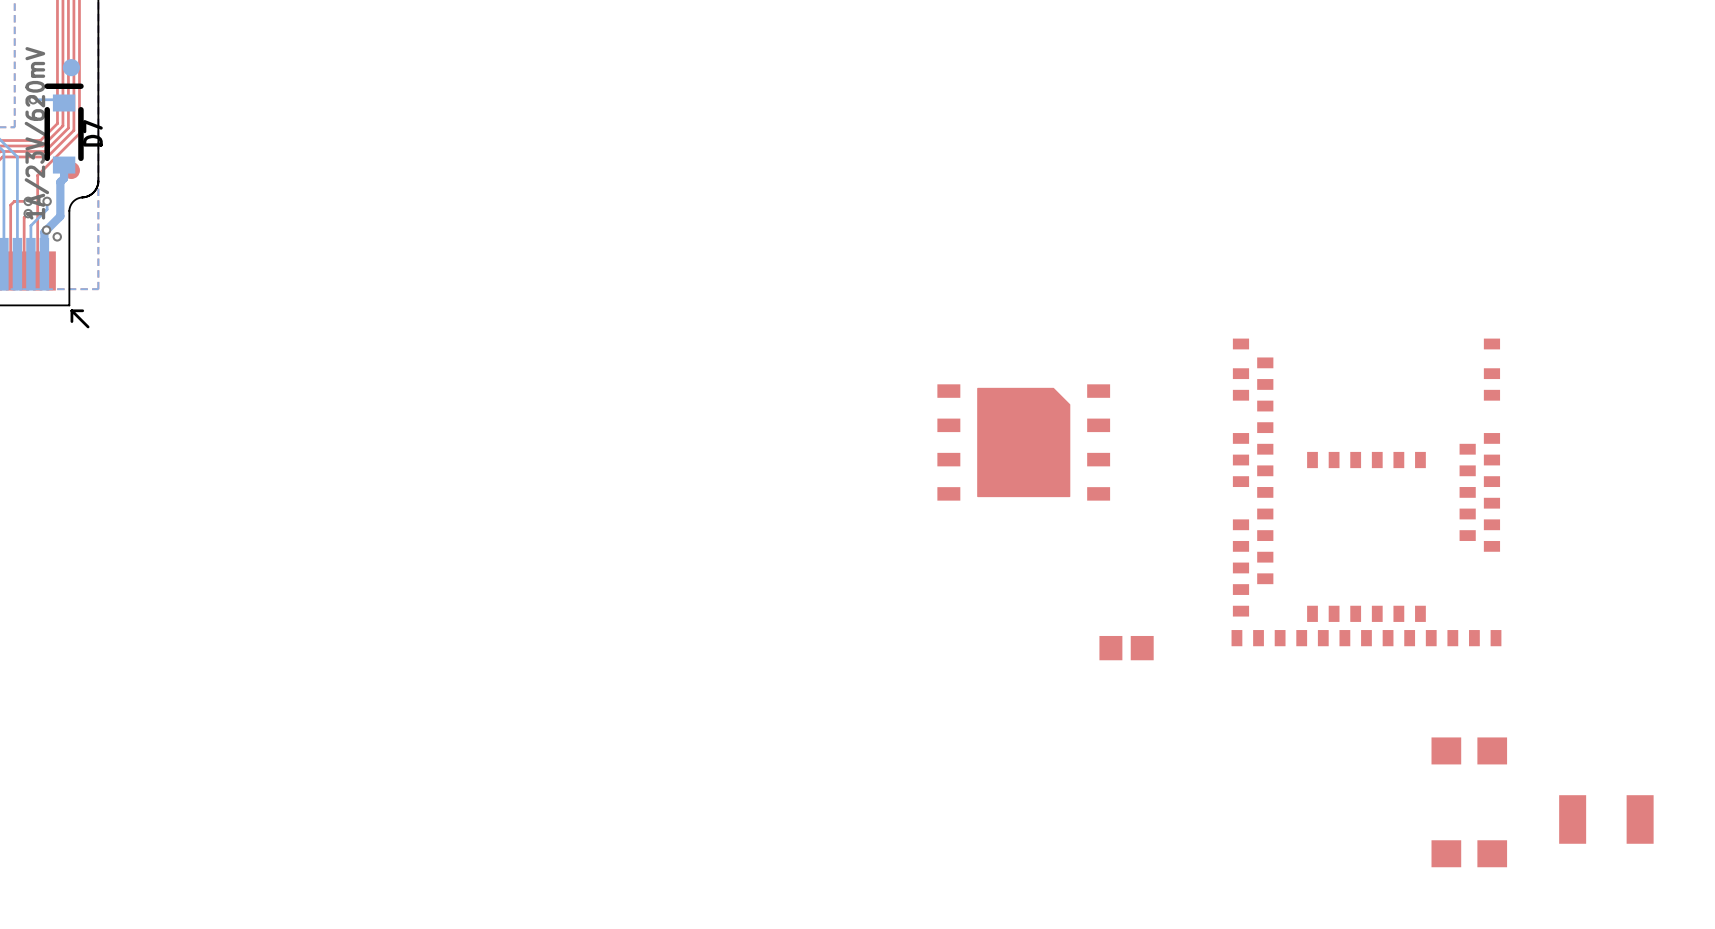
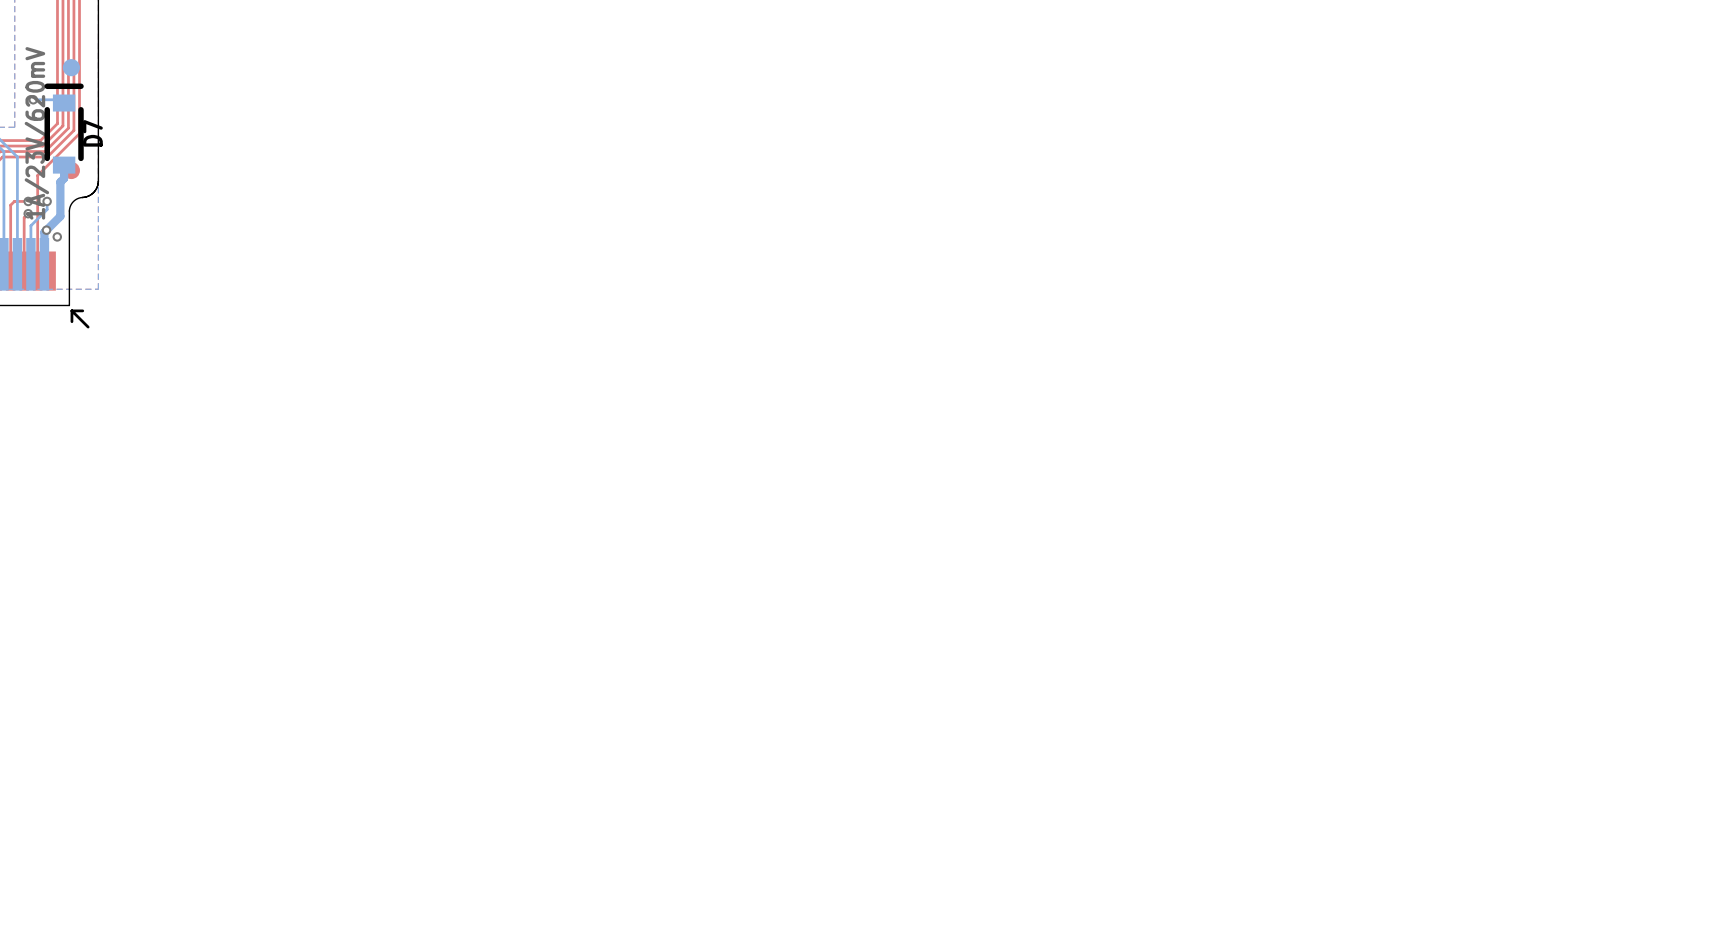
part: (1023, 442) -> none
part: (1366, 492) -> none
part: (1126, 648) -> none
part: (1469, 750) -> none
part: (1606, 819) -> none
part: (1469, 853) -> none

